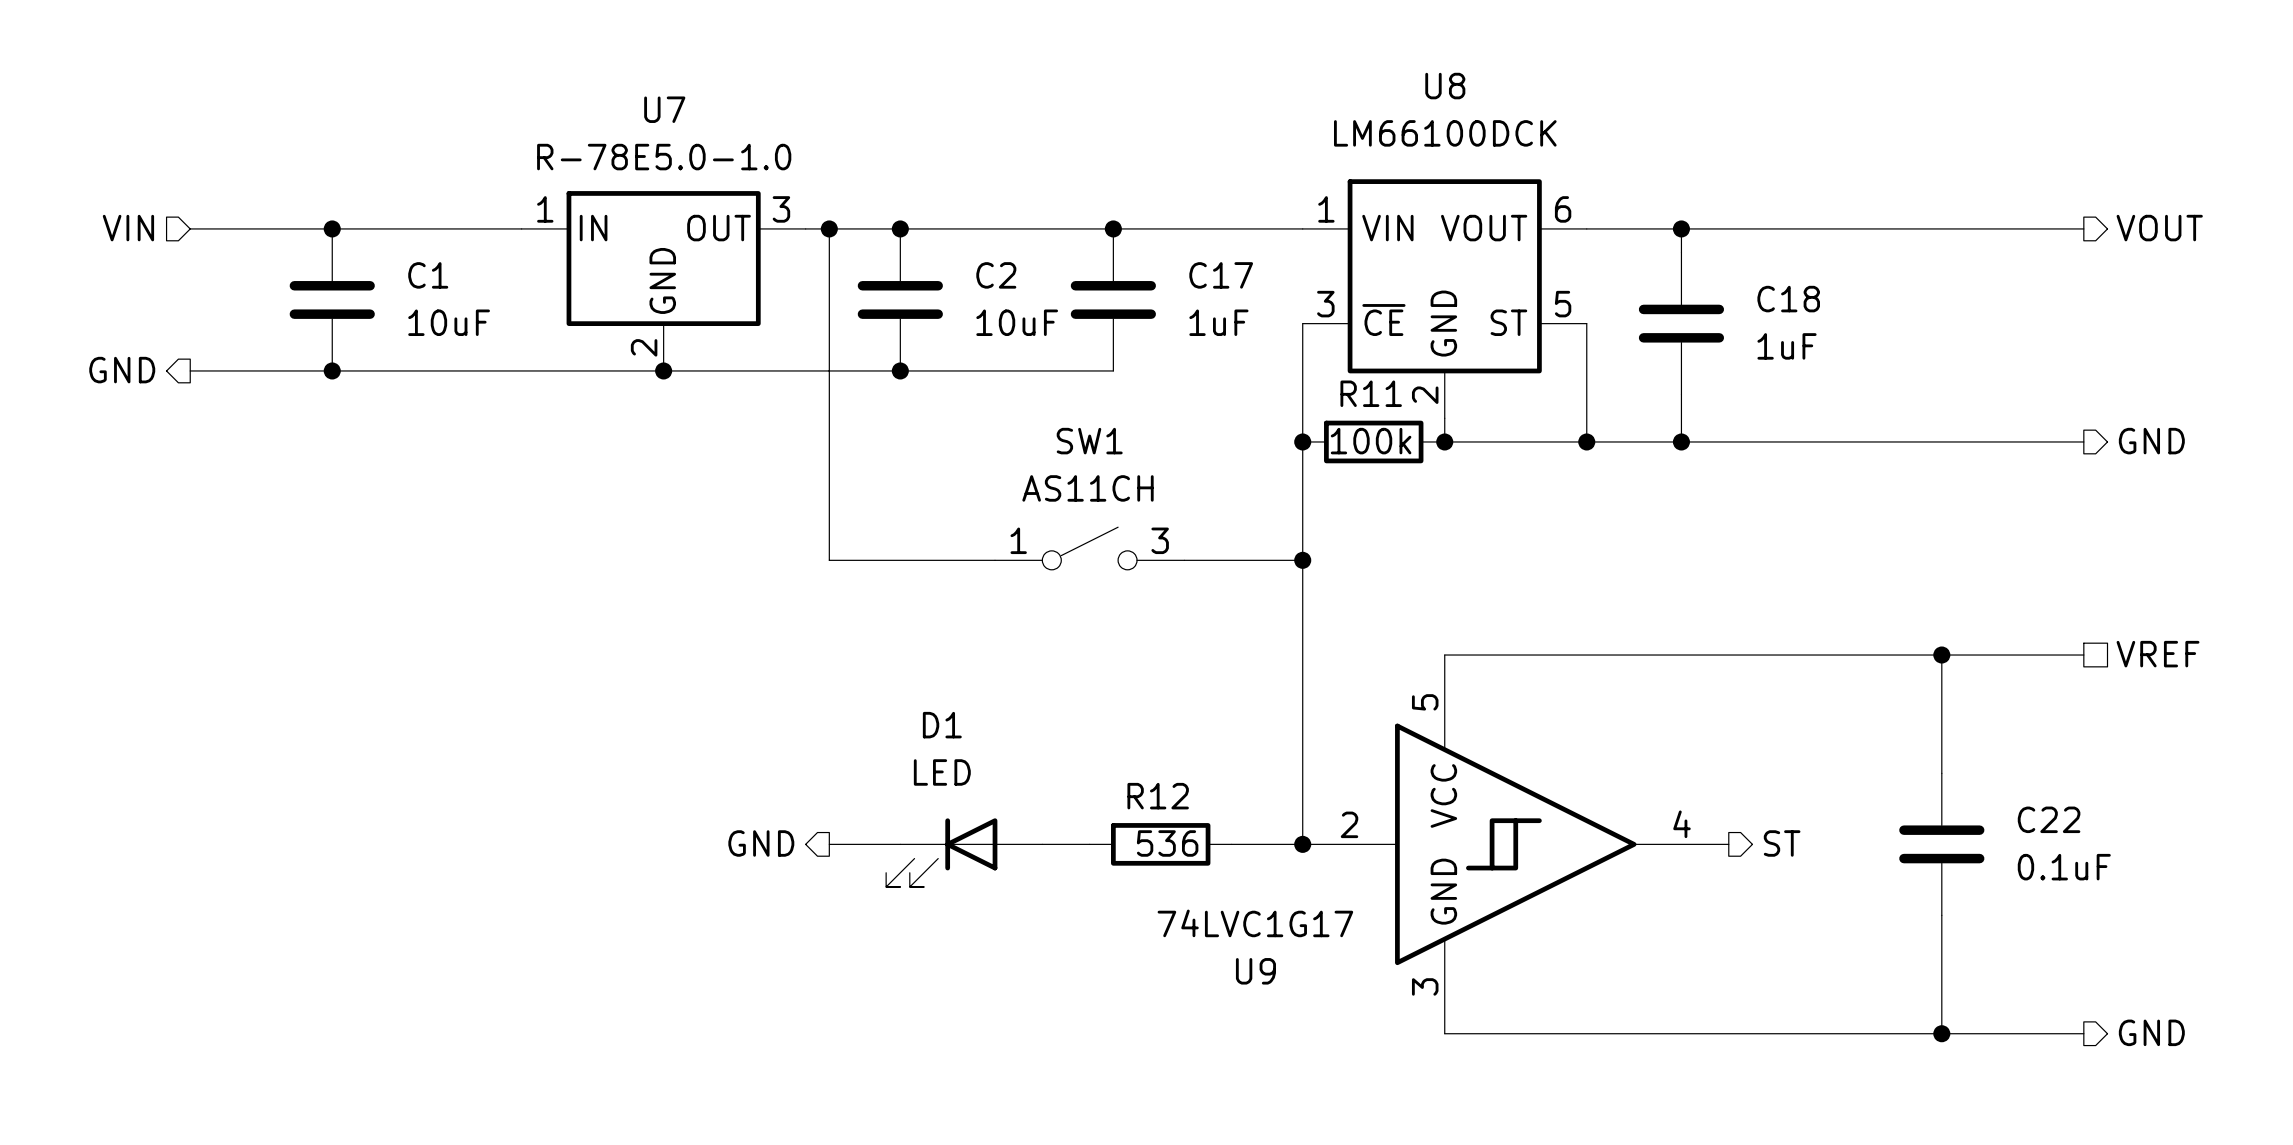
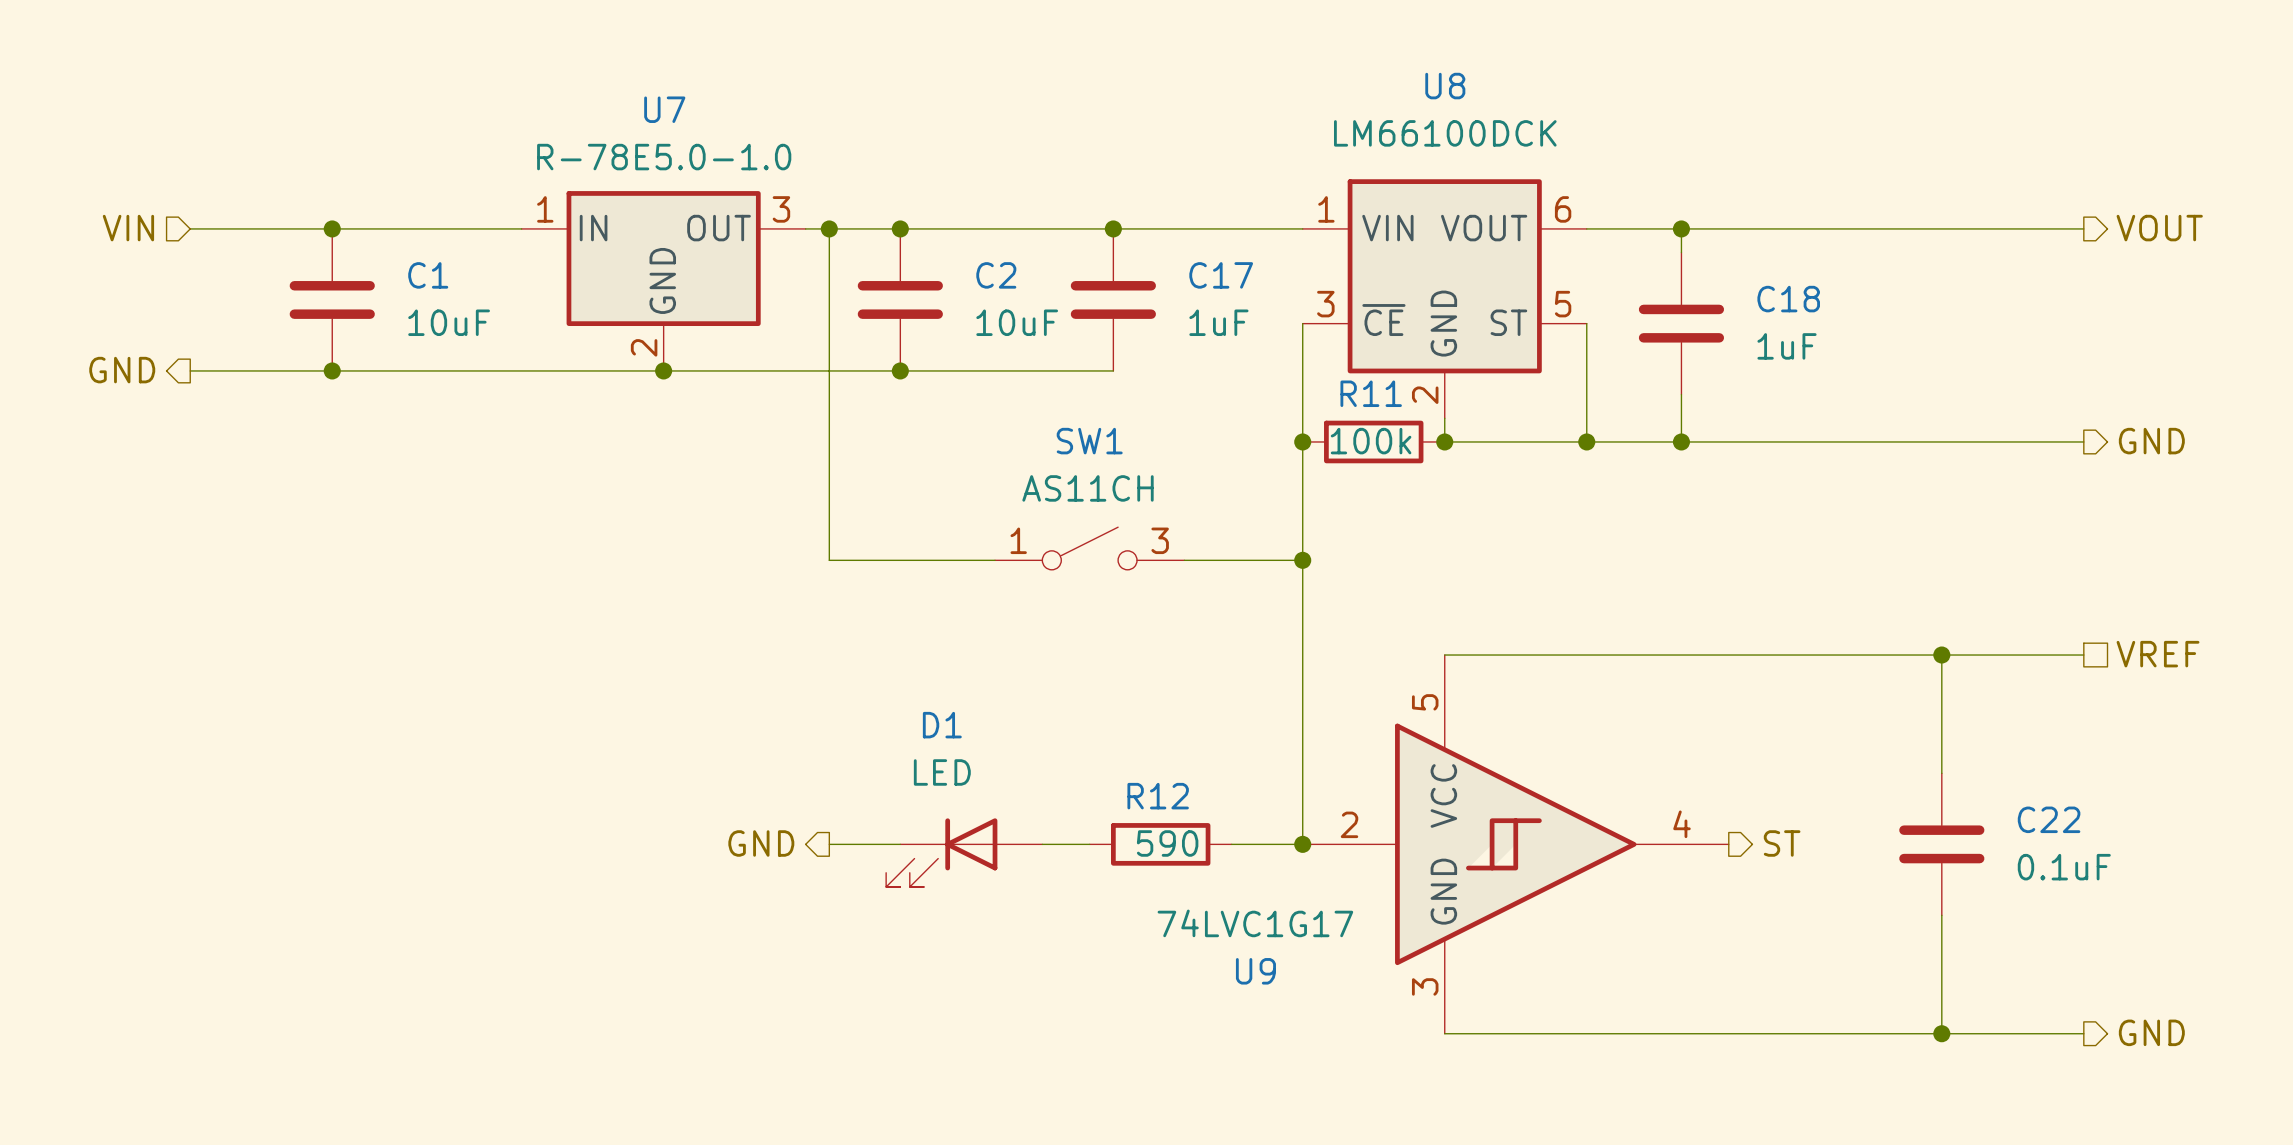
R12 value: 536 (1167, 843) -> 590 (1167, 843)

